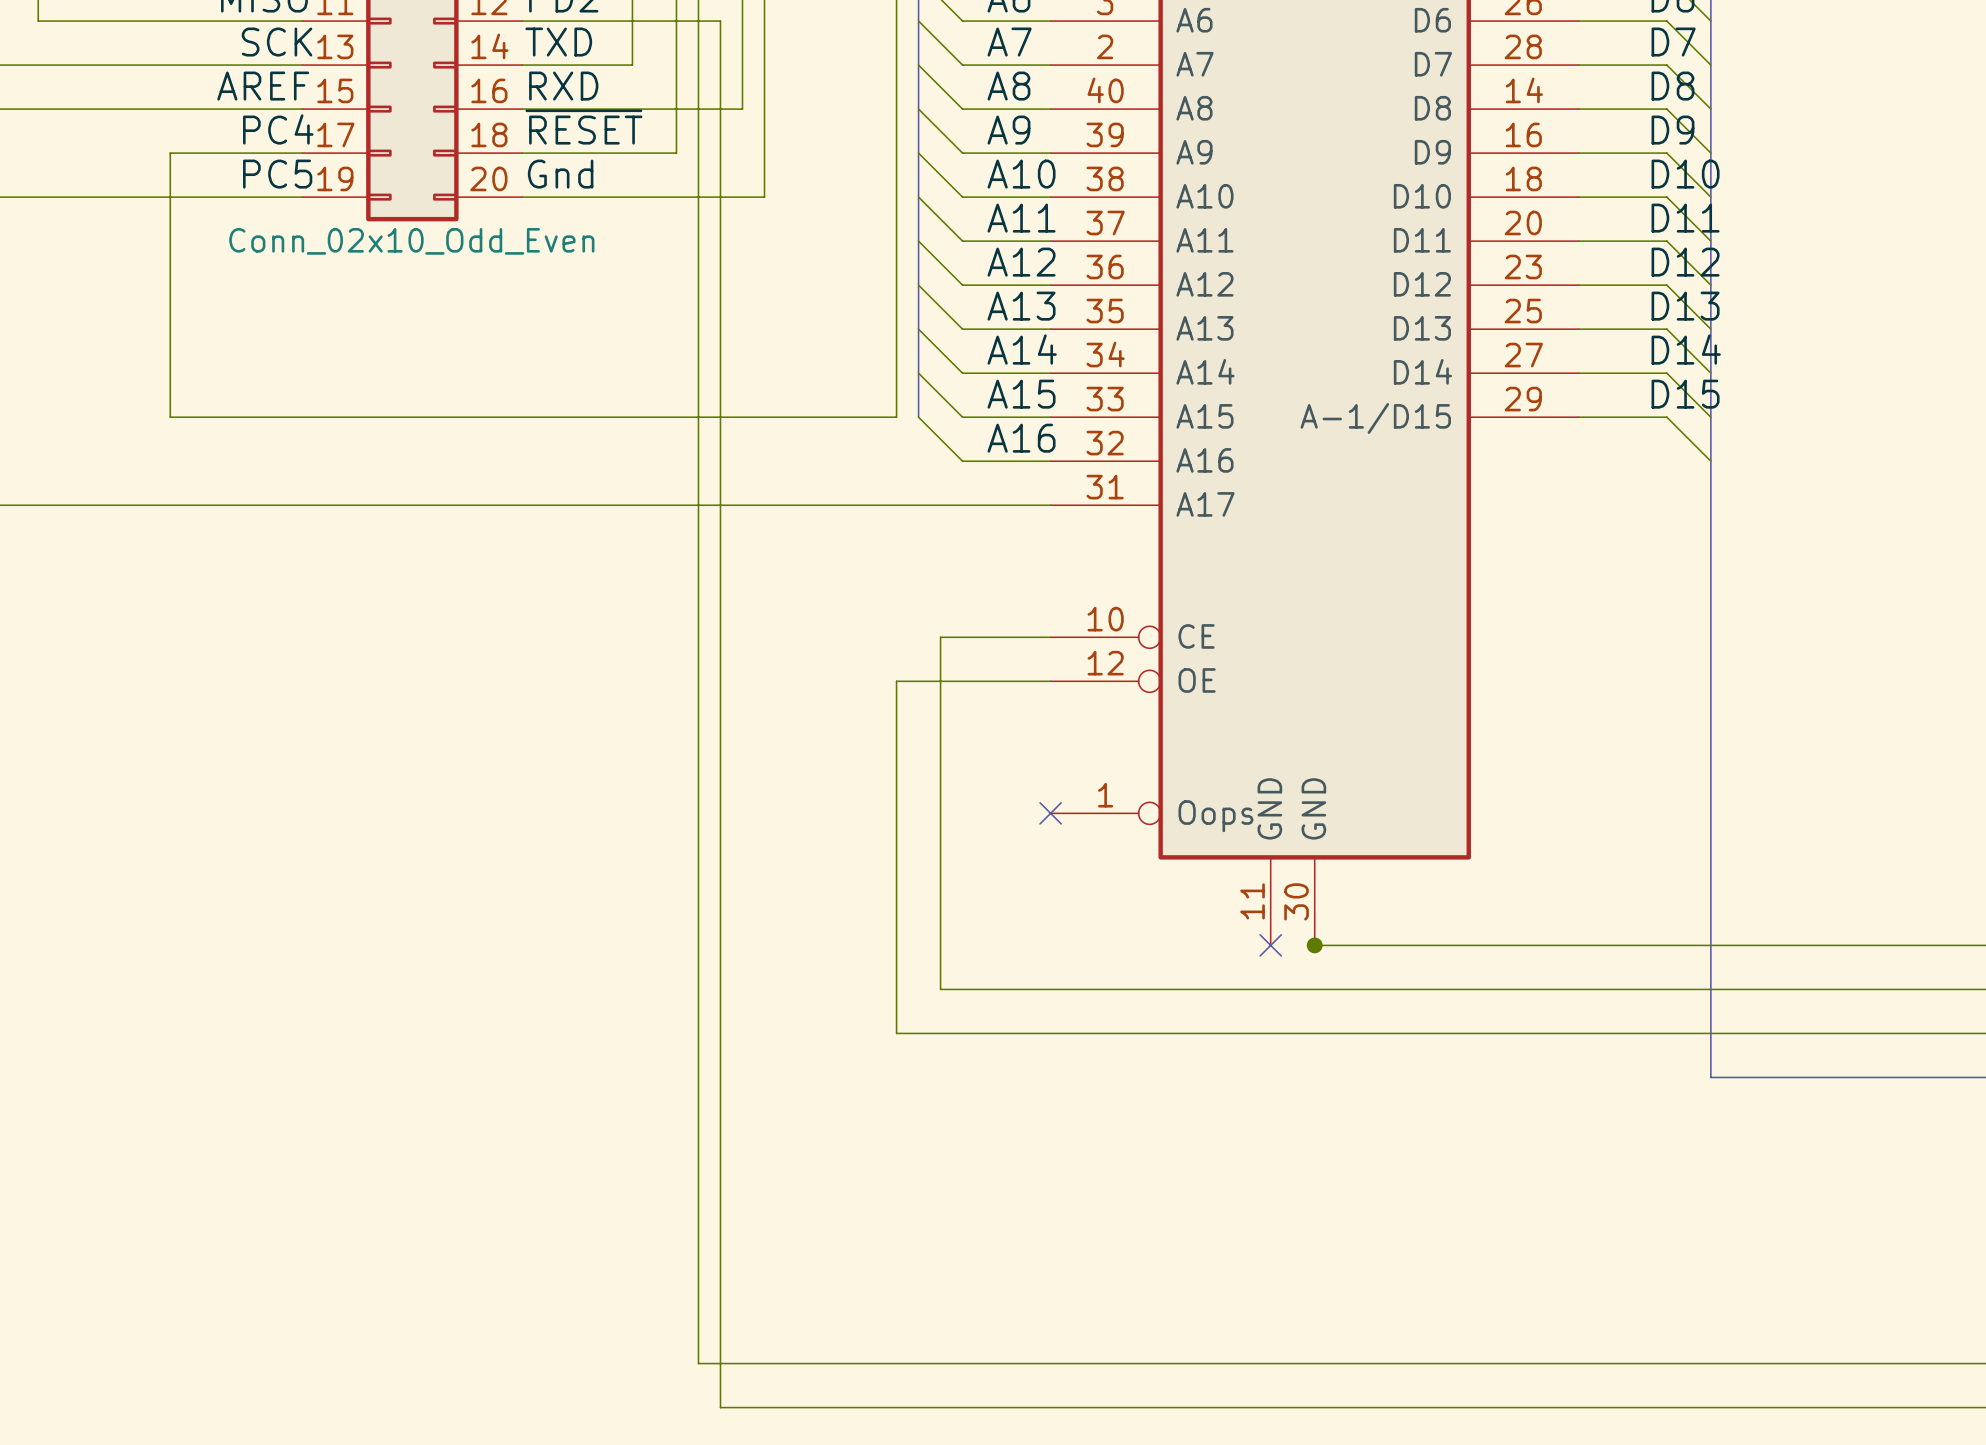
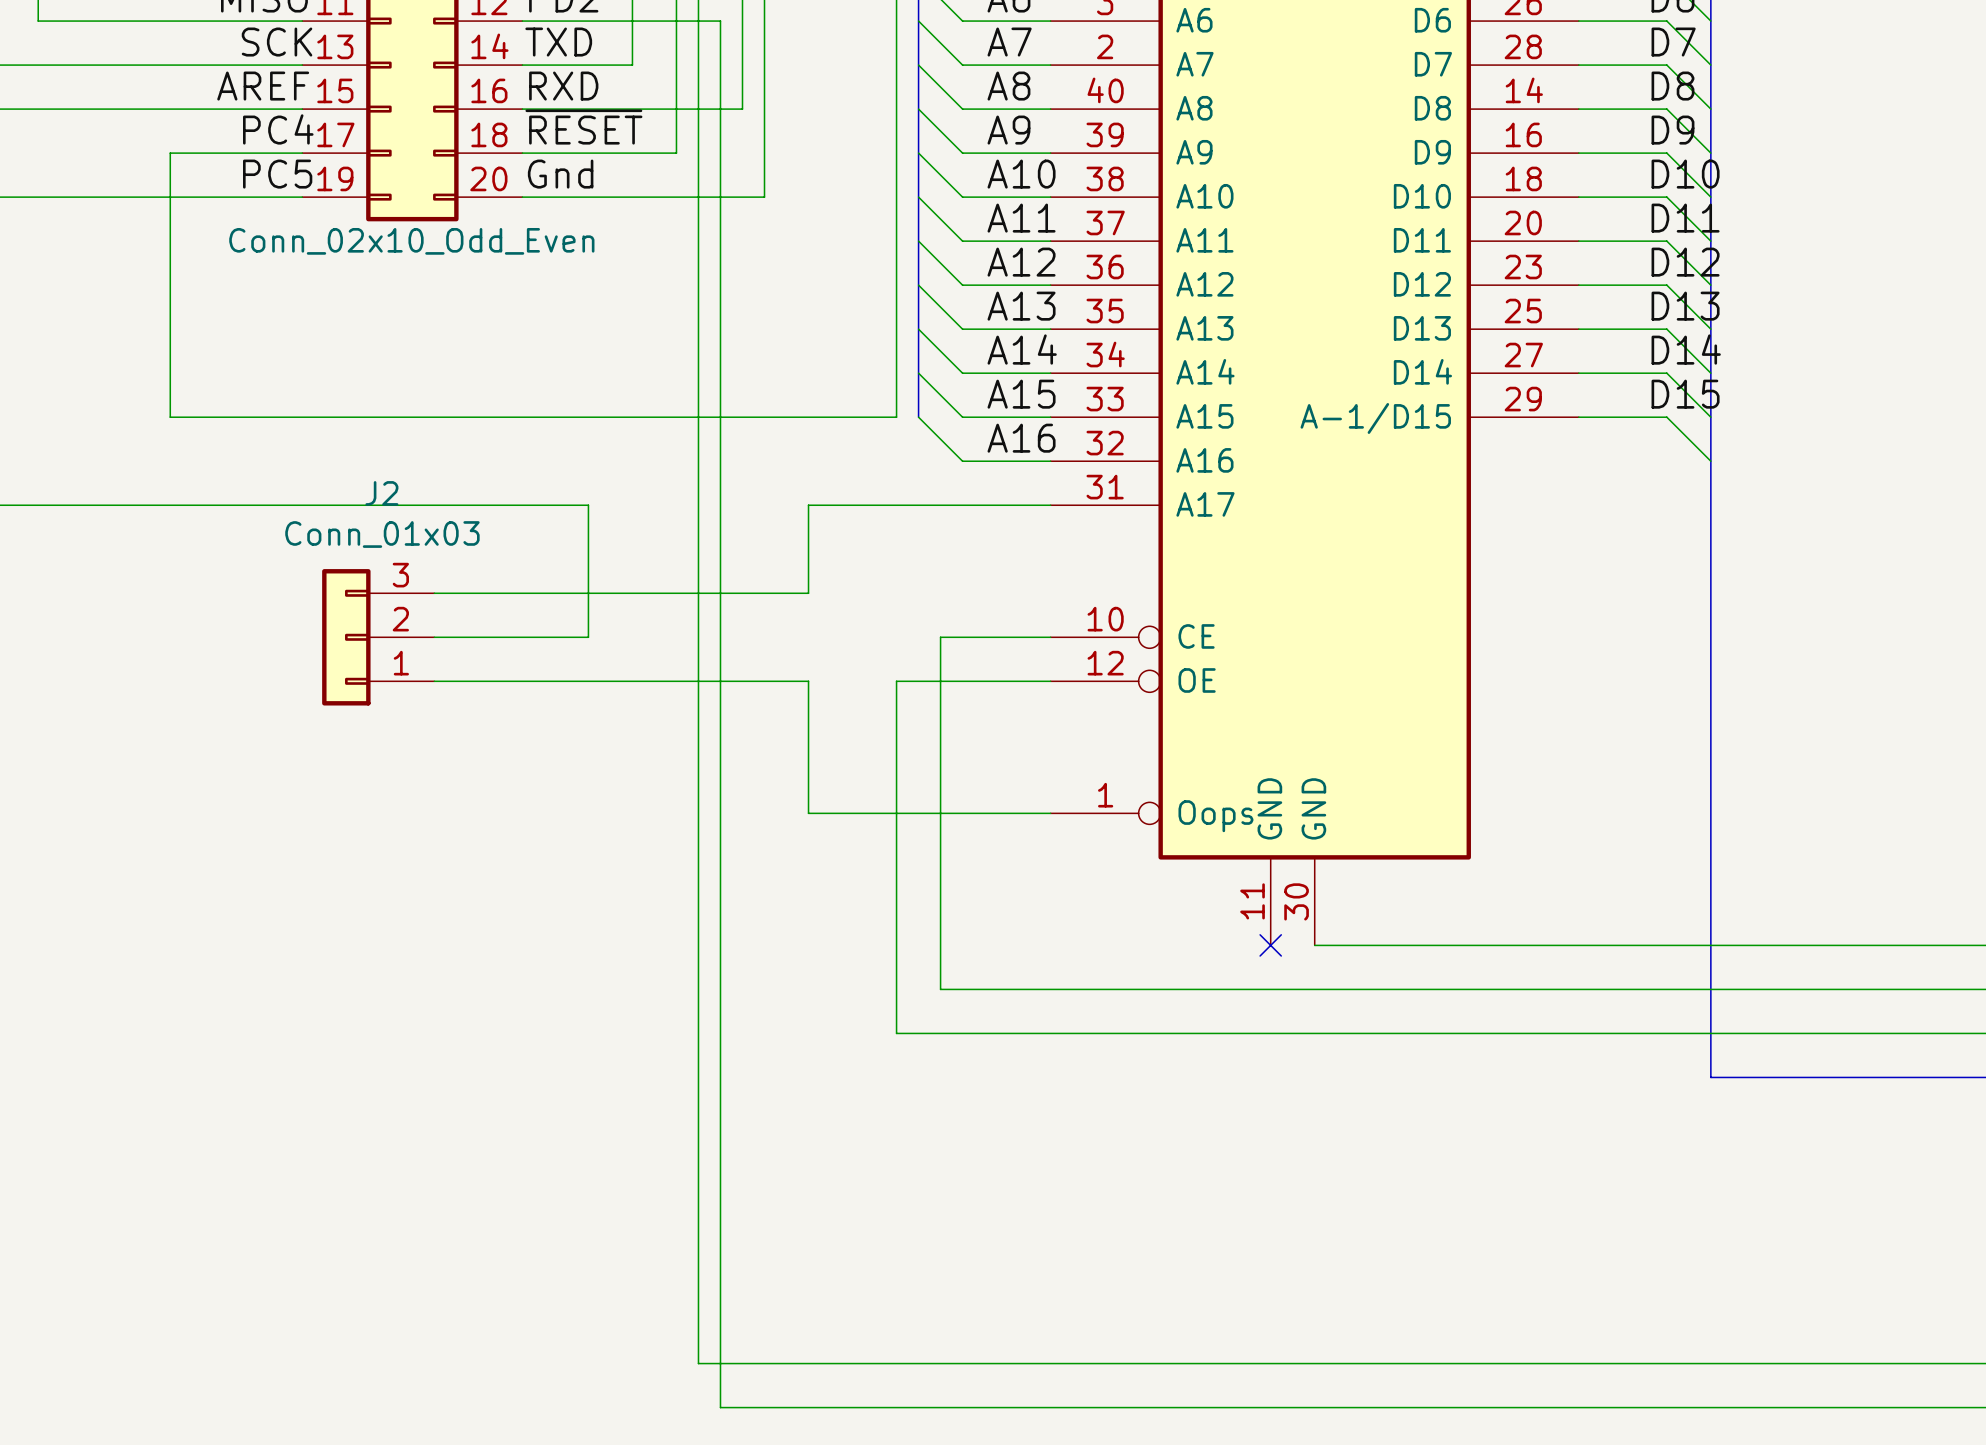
wire: (588, 505) (808, 505) -> (434, 593) (808, 593) (808, 505)
wire: none -> (588, 505) (588, 637) (434, 637)
J2: none -> Conn_01x03 (378, 637)
wire: none -> (434, 681) (808, 681) (808, 813) (1050, 813)
no-connect mark: (1050, 813) -> none
junction: (1314, 945) -> none

